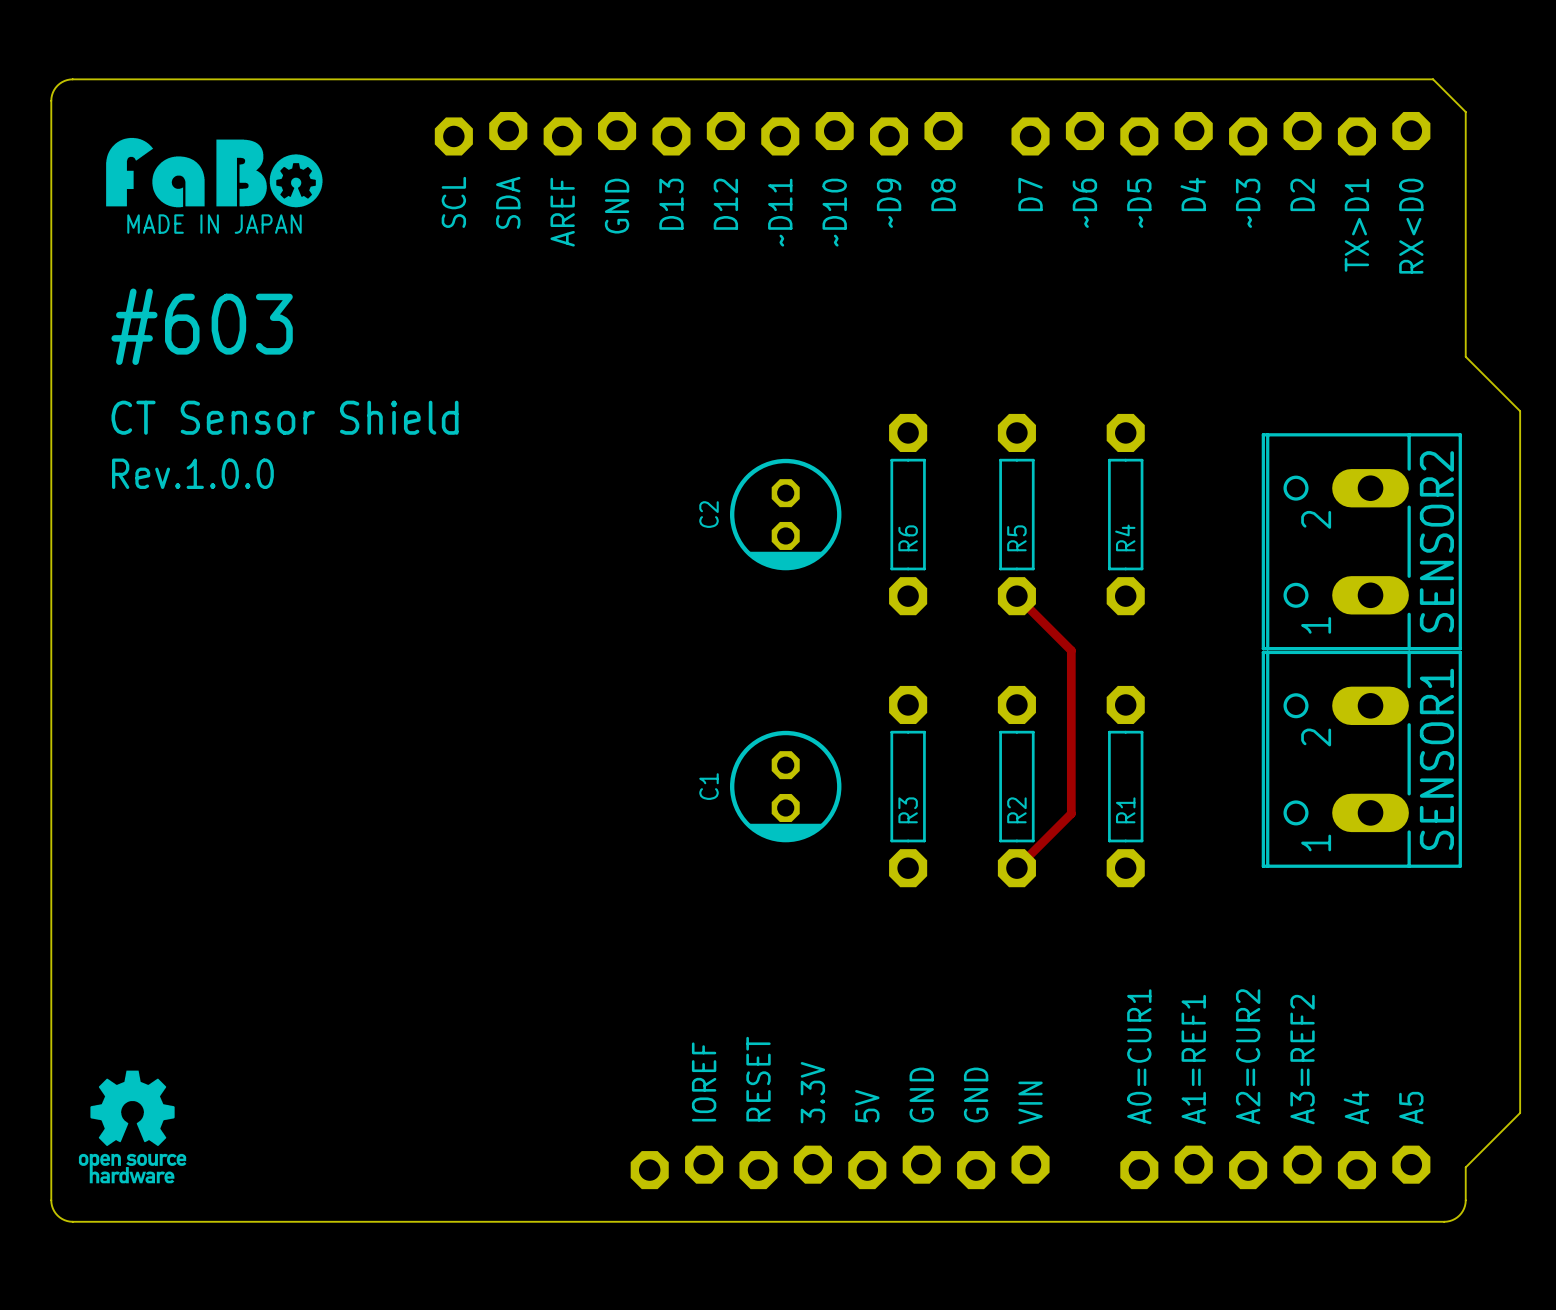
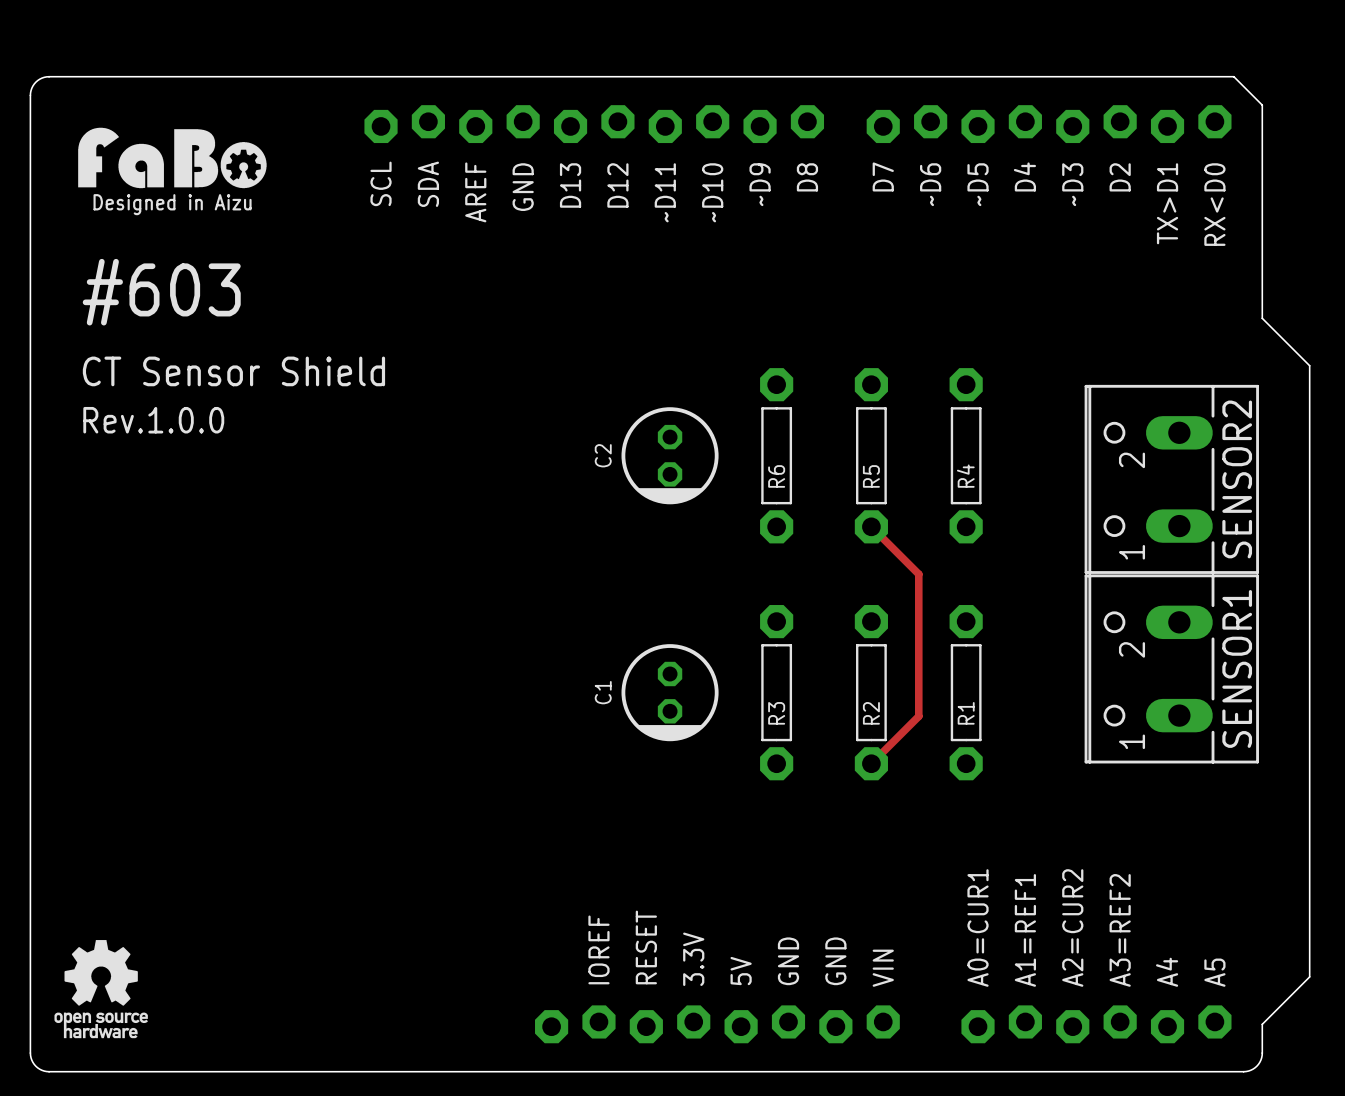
text: MADE IN JAPAN (214, 224) -> Designed in Aizu (172, 204)

